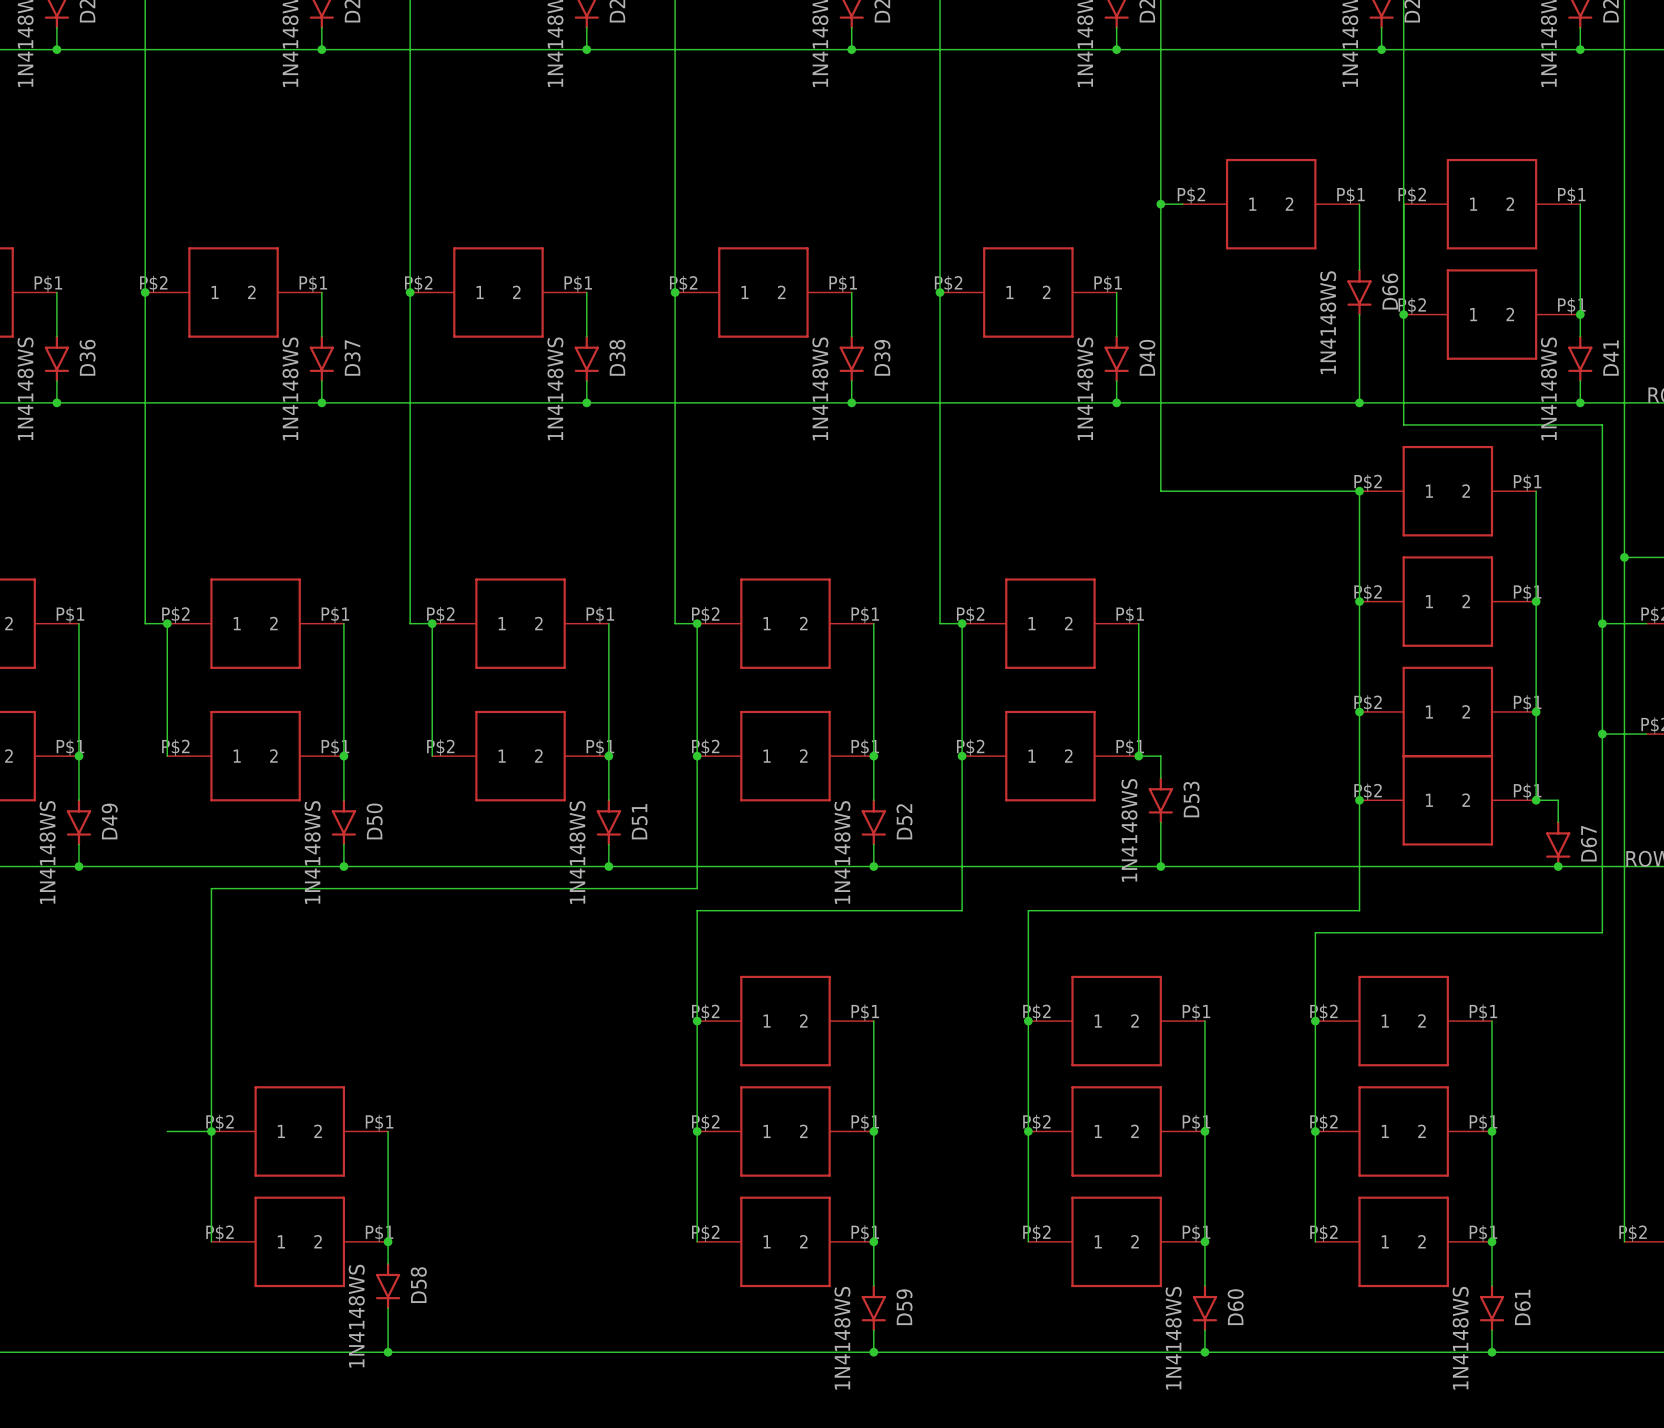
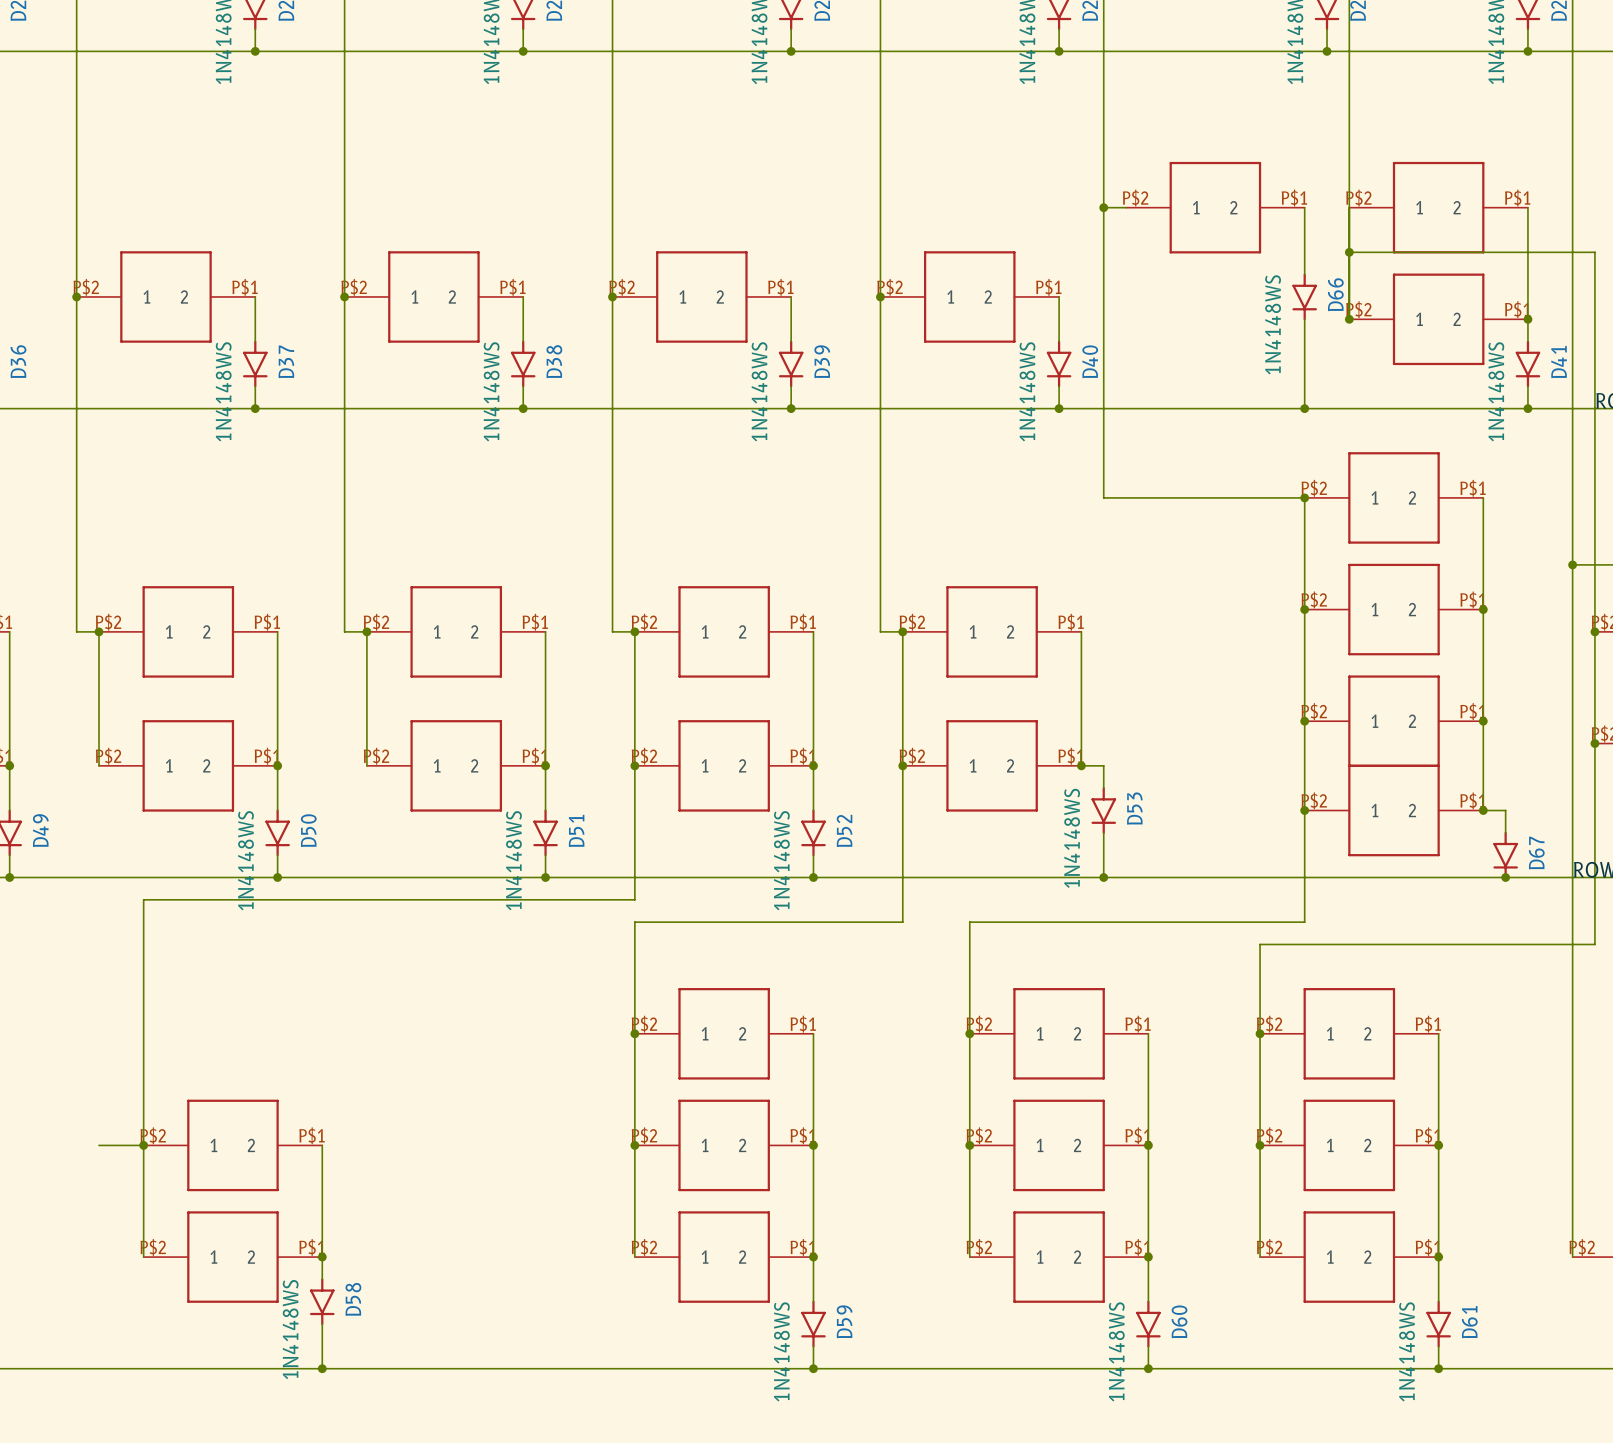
junction: none -> (1349, 252)
wire: (1403, 314) (1403, 424) (1602, 424) (1602, 932) -> (1349, 252) (1594, 252) (1594, 944) (1550, 944)
wire: (1602, 623) (1646, 623) -> none
junction position: (1602, 623) -> (1594, 631)
wire: (1602, 734) (1646, 734) -> none
junction position: (1602, 734) -> (1594, 743)

